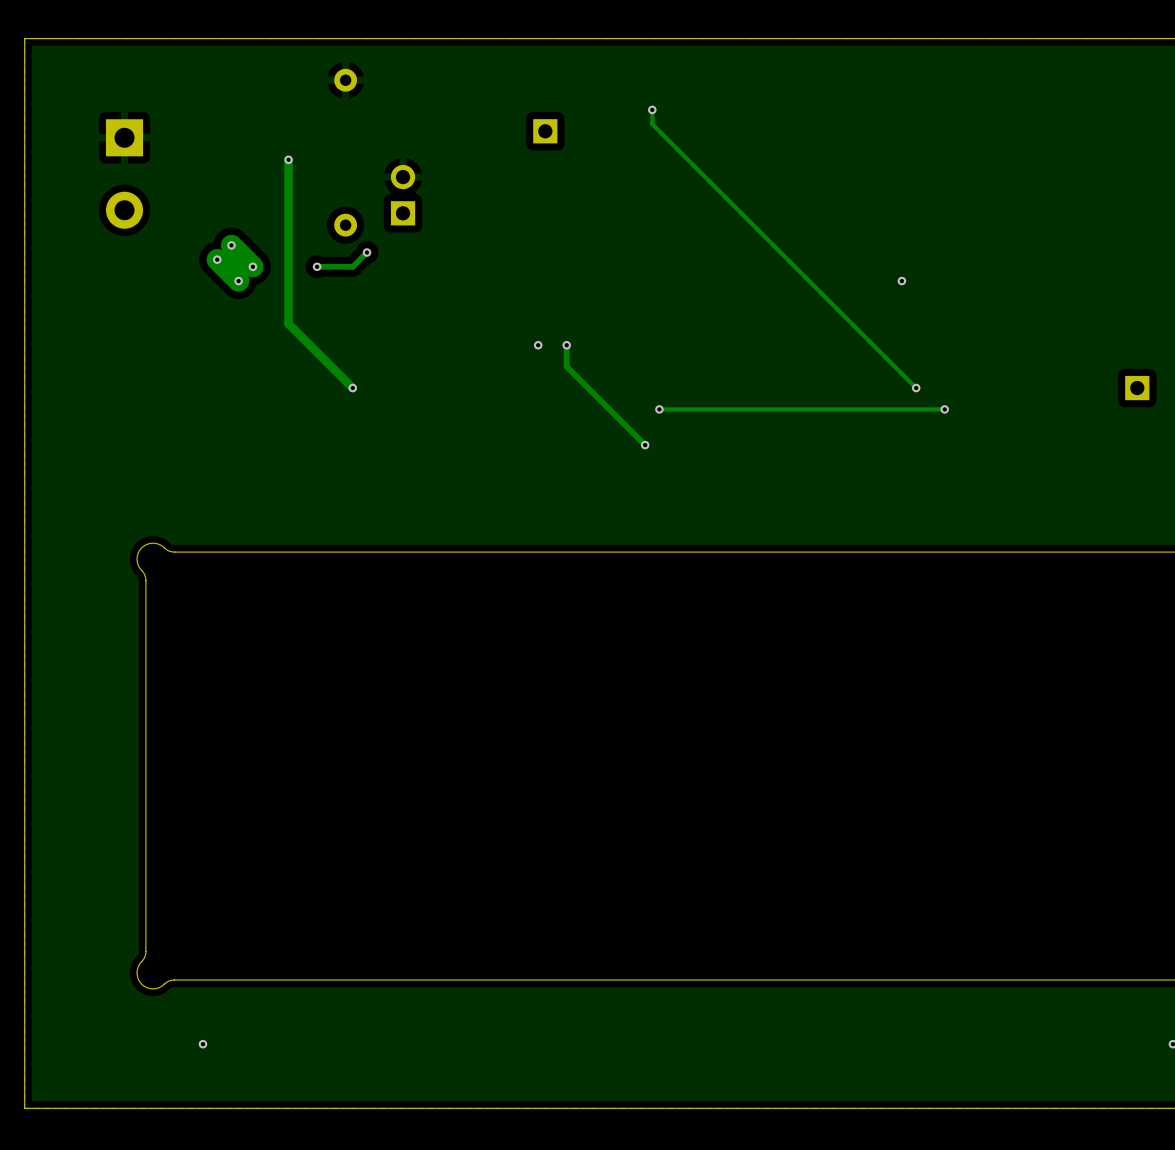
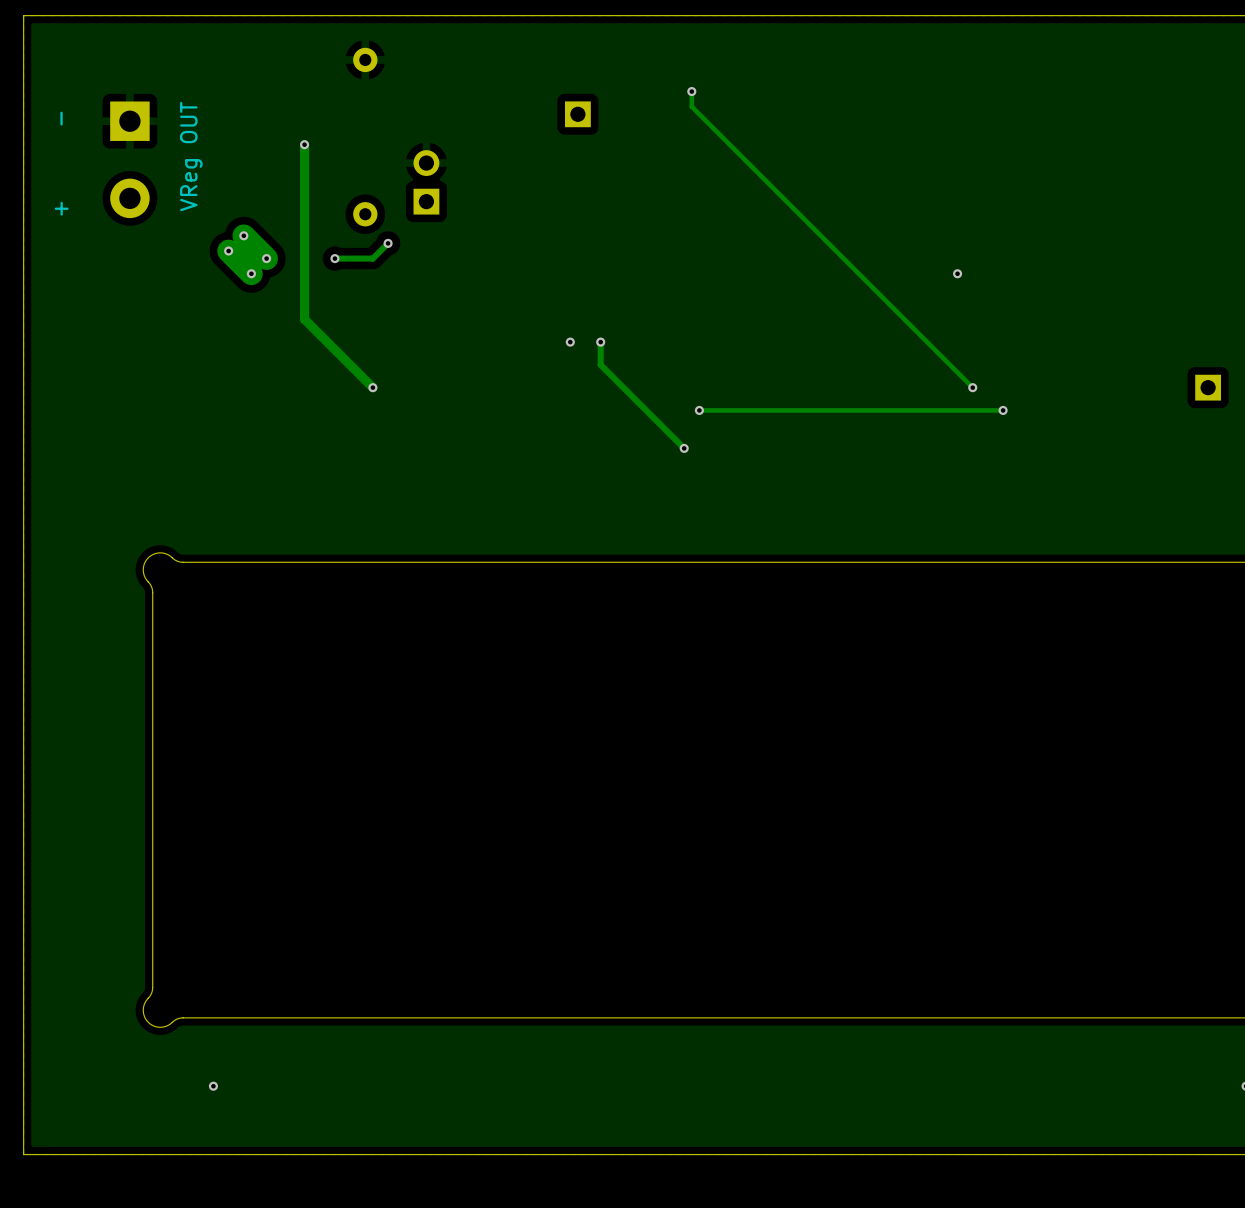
text: none -> - (61, 118)
text: none -> VReg OUT (191, 156)
text: none -> + (61, 208)

